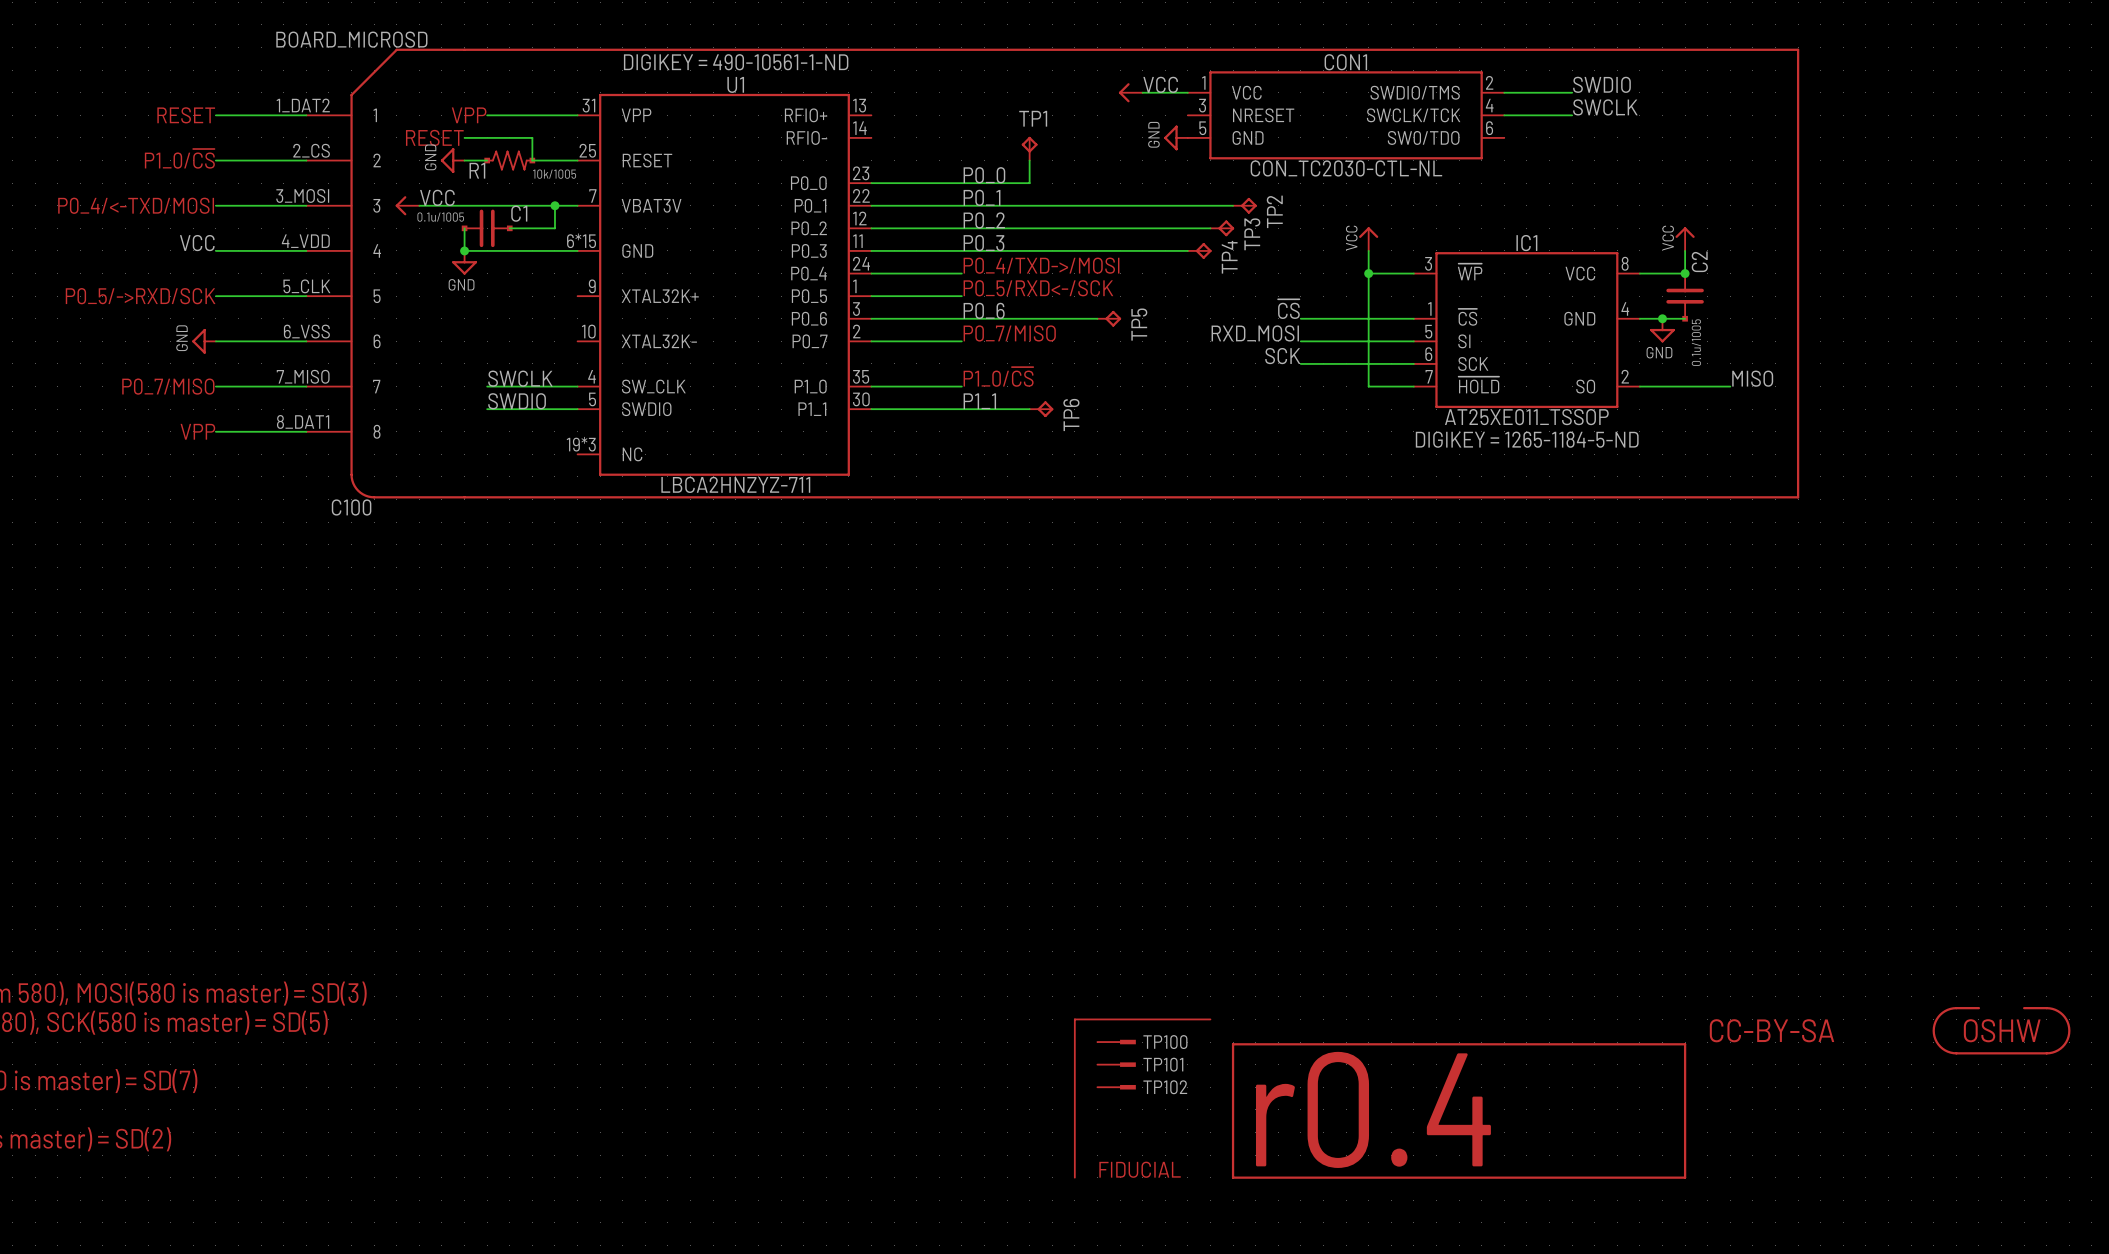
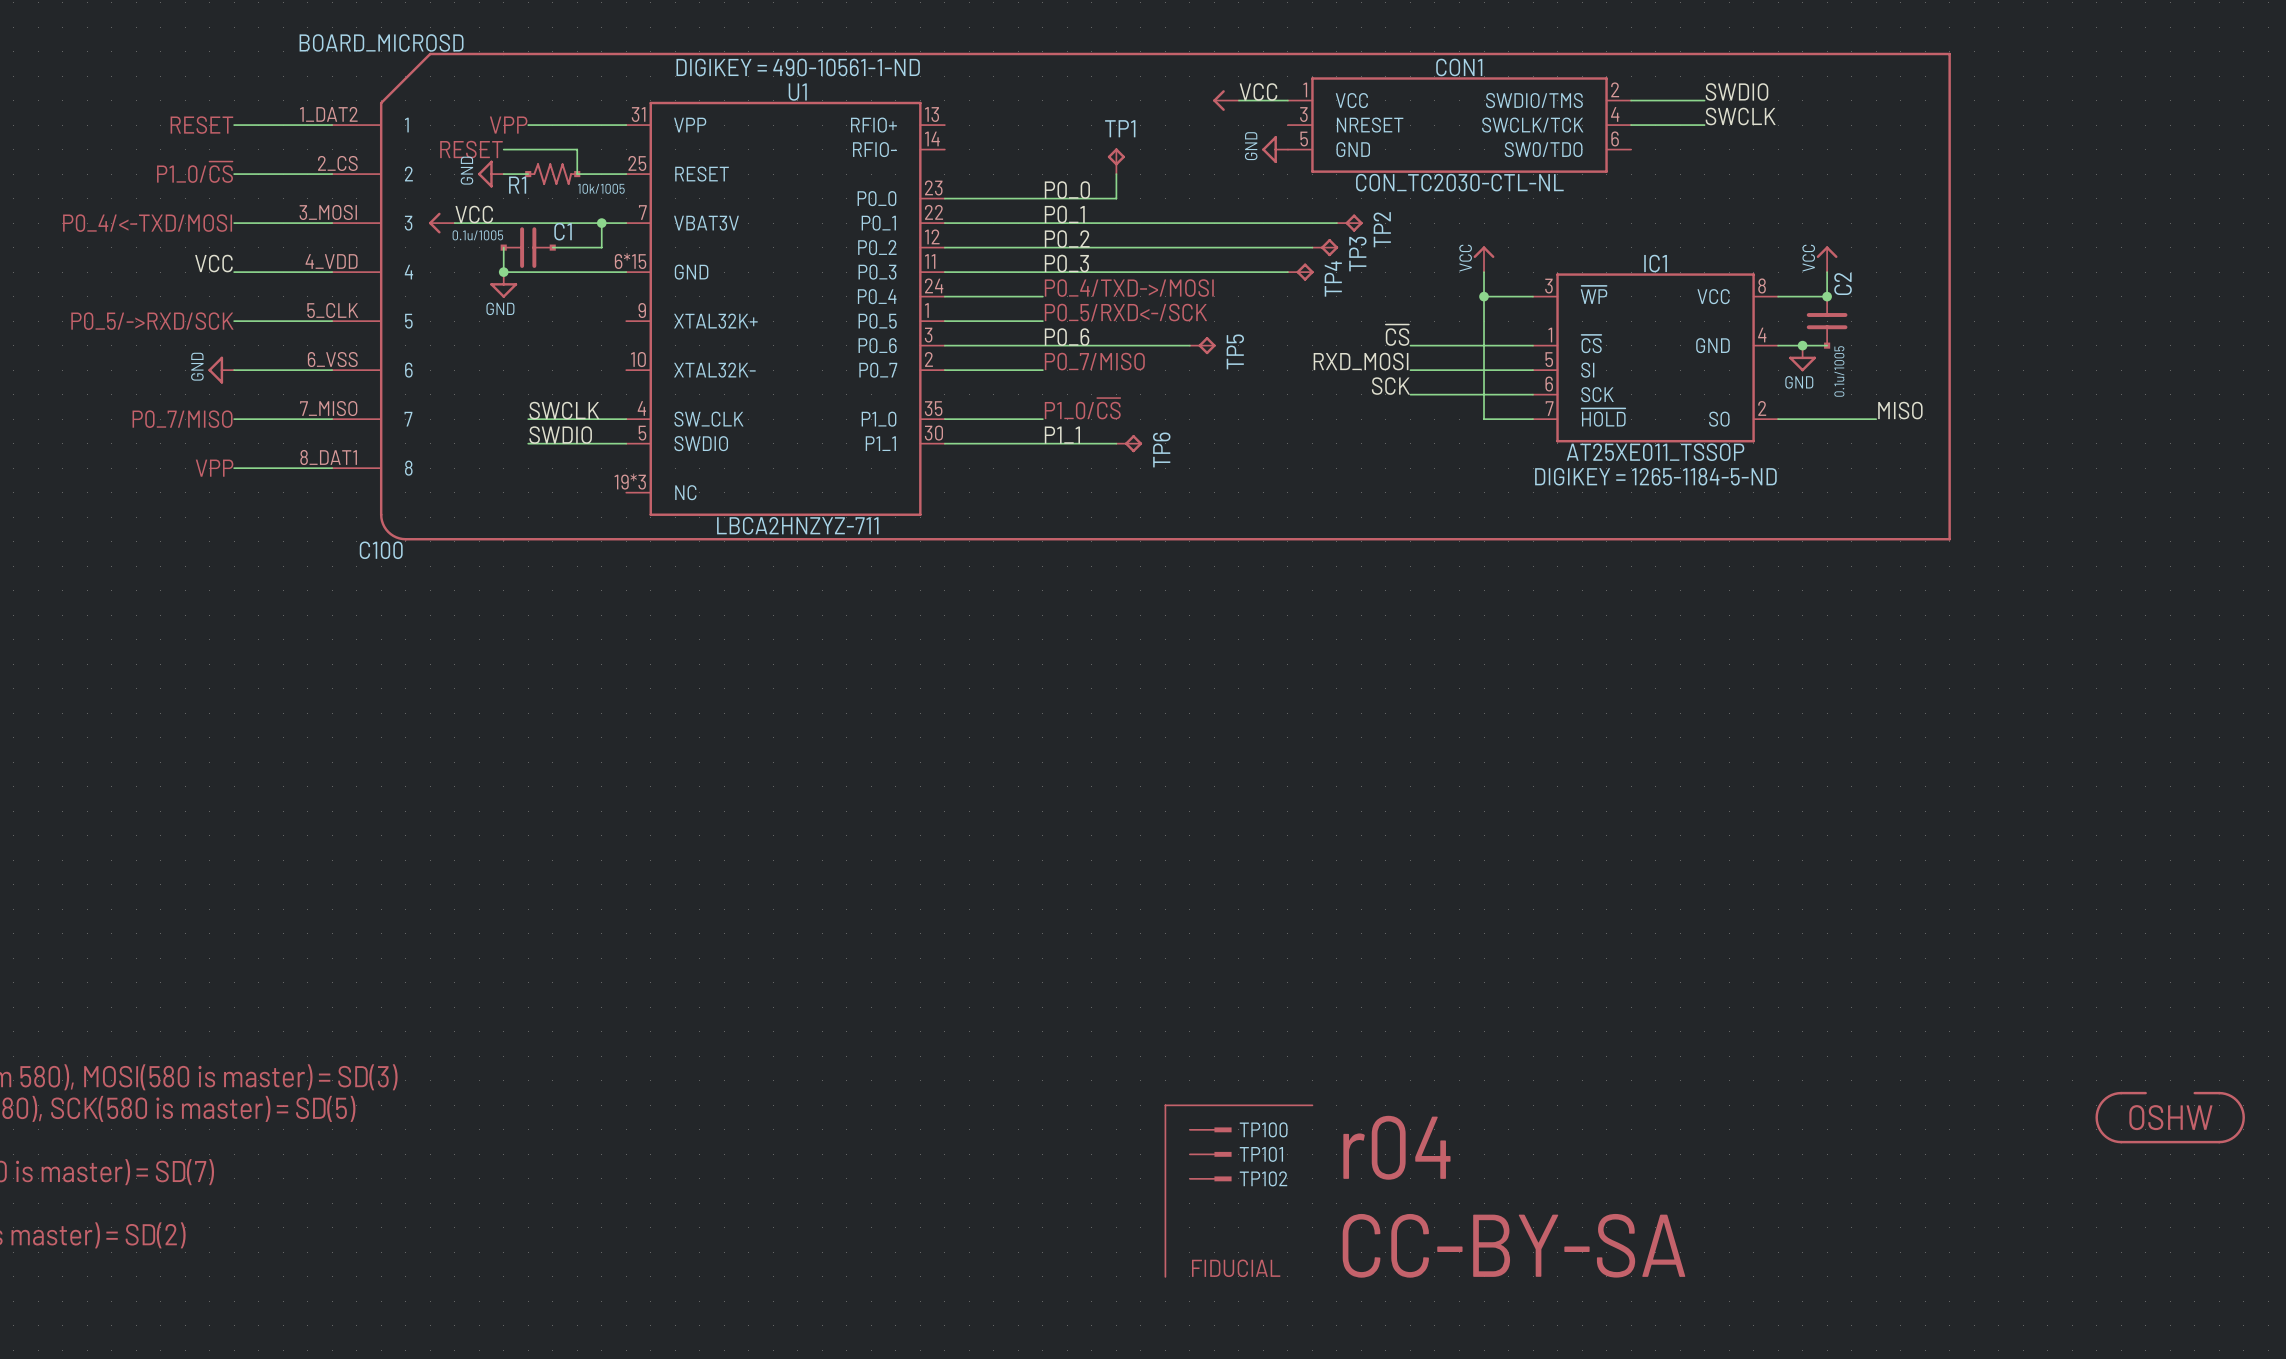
text: CC-BY-SA (1771, 1030) -> none
text: none -> r04 (1396, 1147)
part: r0.4 (1459, 1110) -> none
text: none -> CC-BY-SA (1514, 1245)

